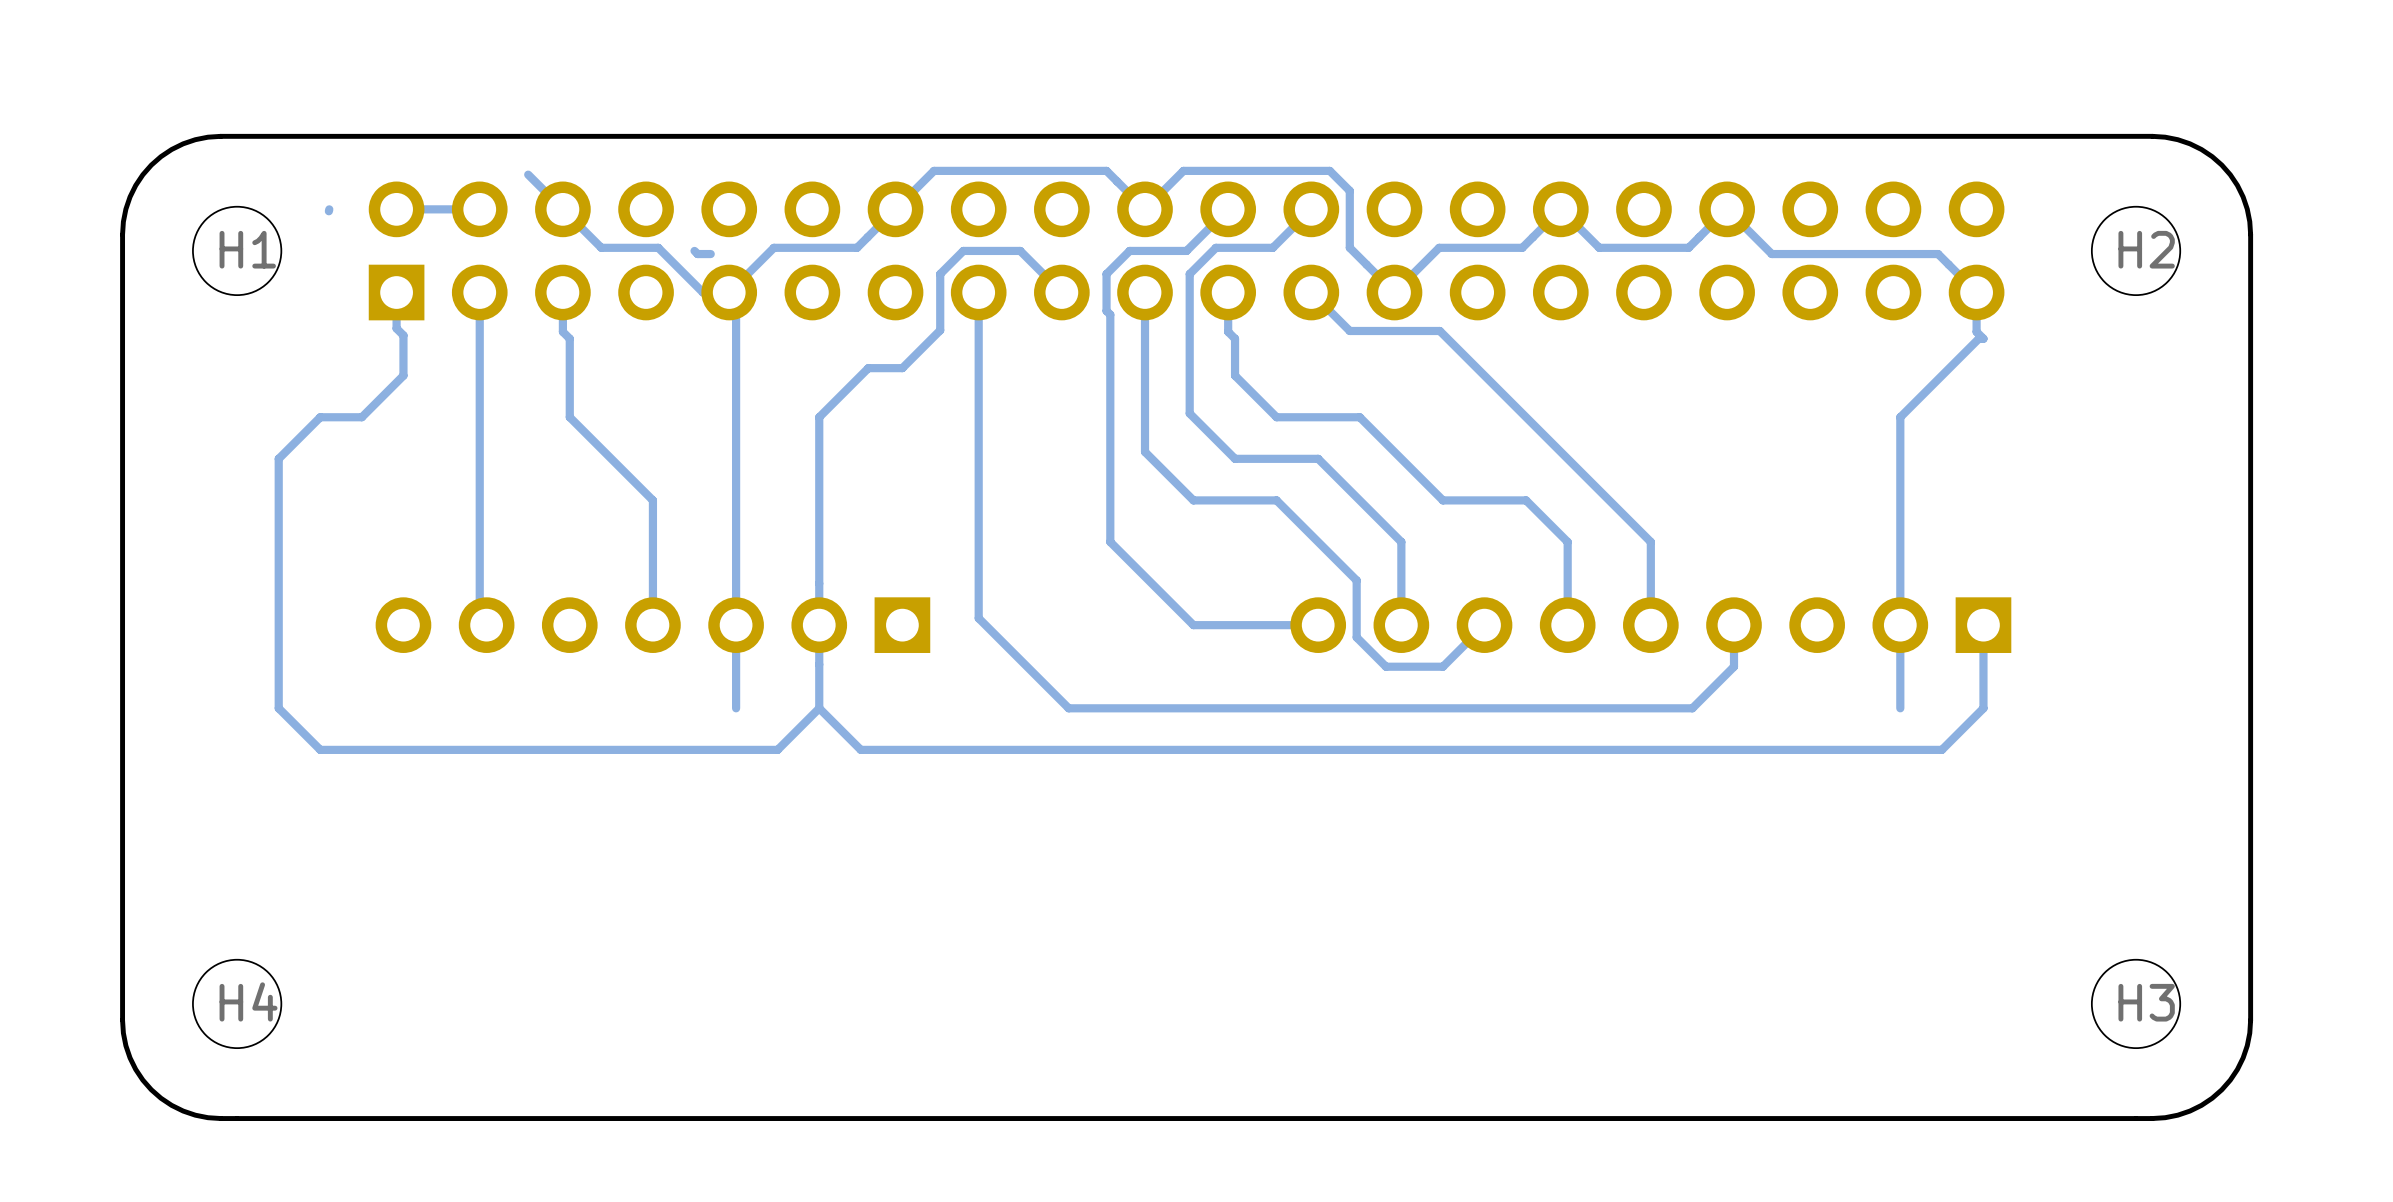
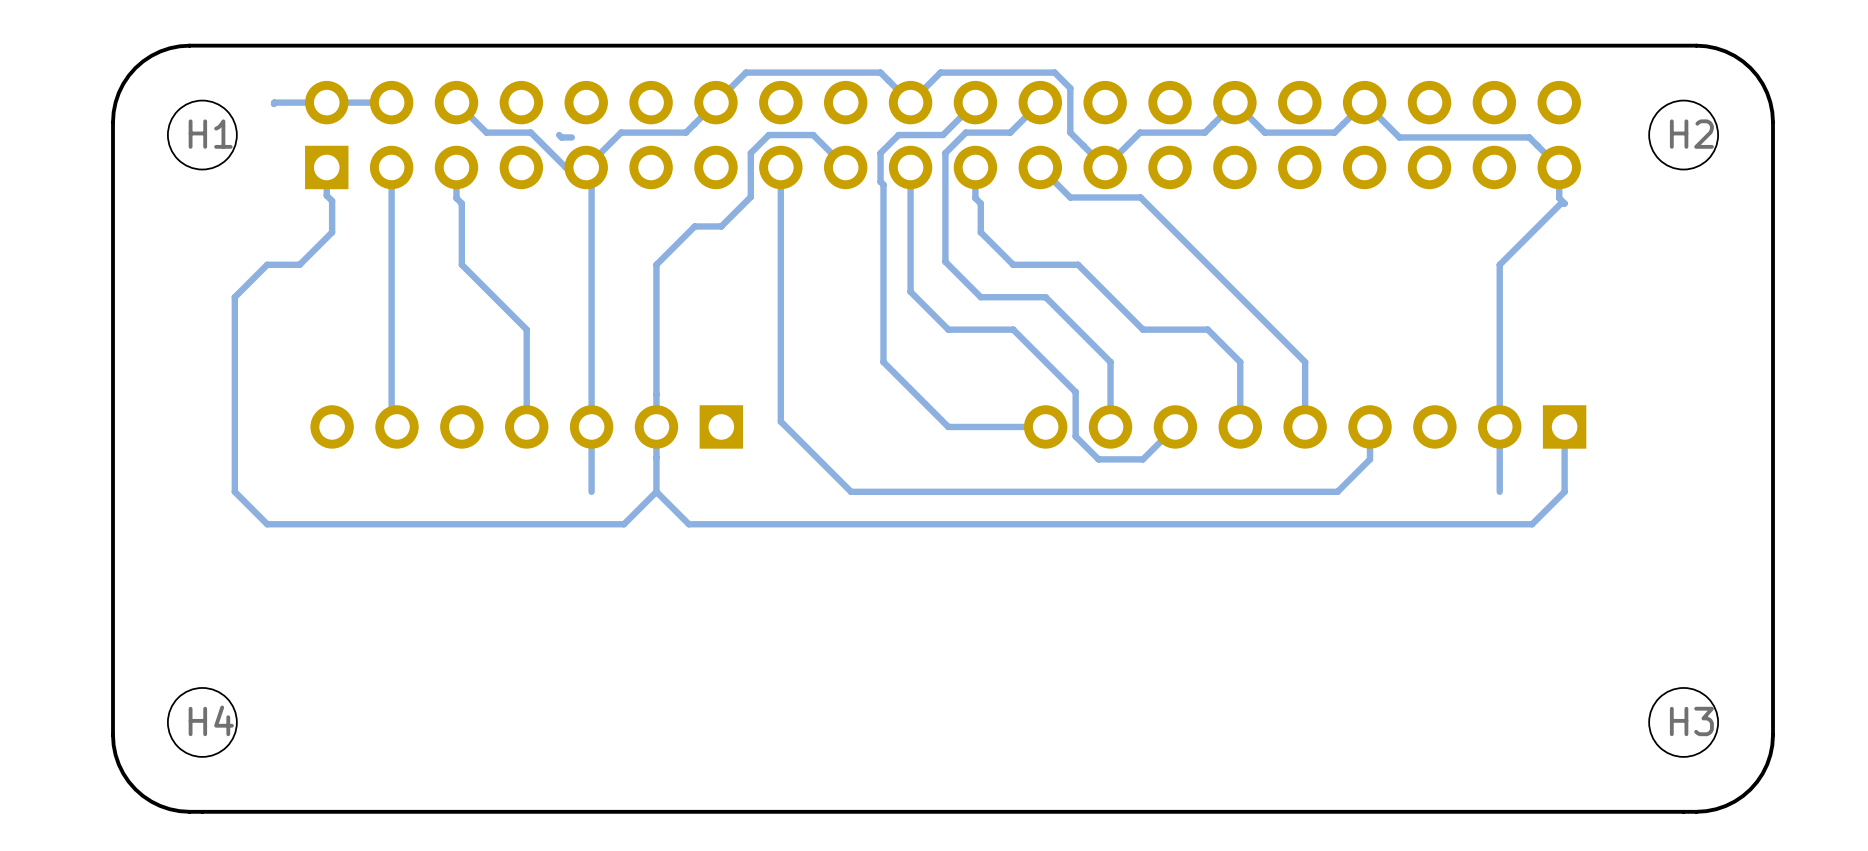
bottom track: (528, 174) (562, 209) -> none
bottom track: none -> (274, 102) (326, 102)

